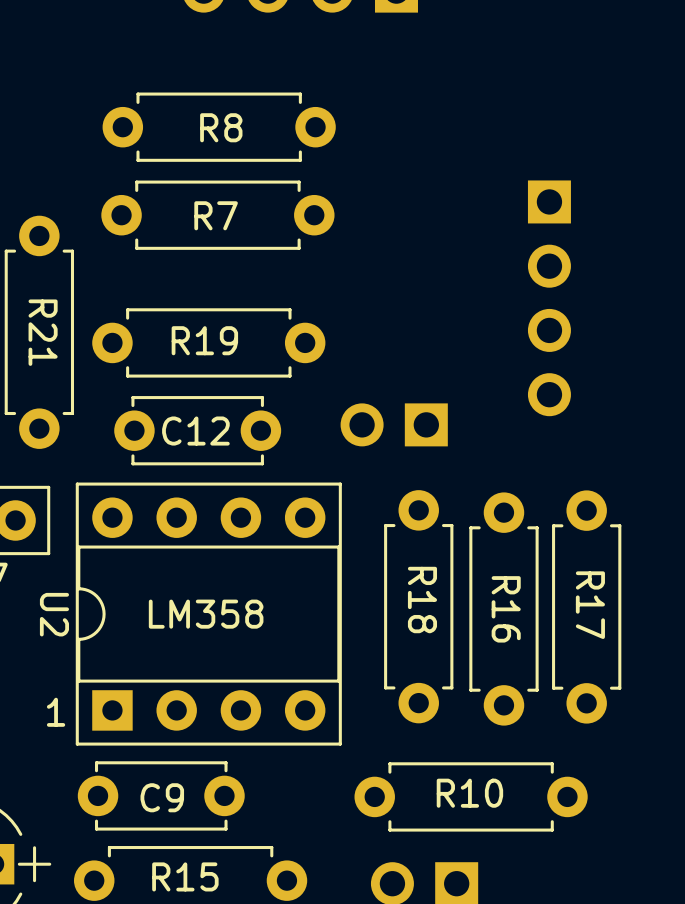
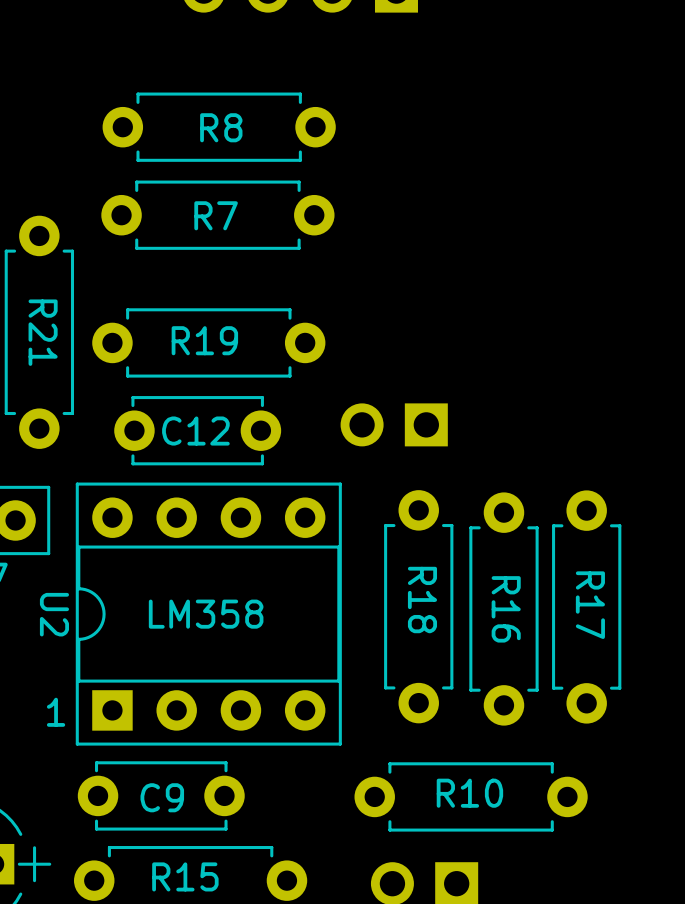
part: (549, 298) -> none

